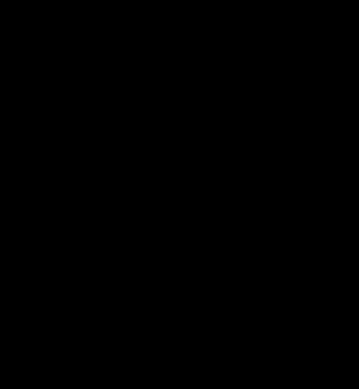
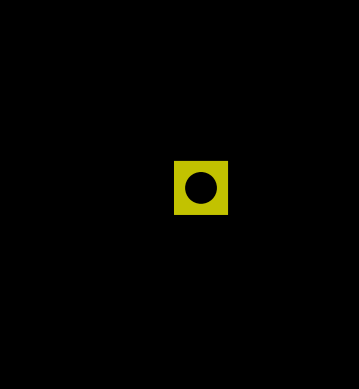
part: none -> (201, 187)

